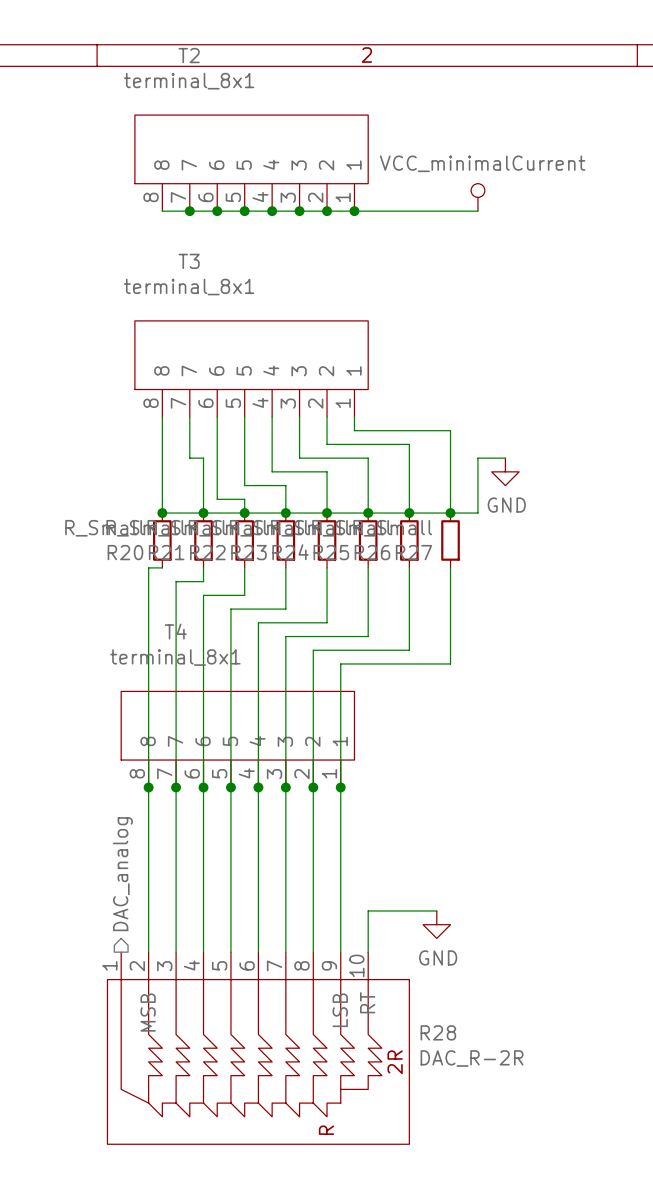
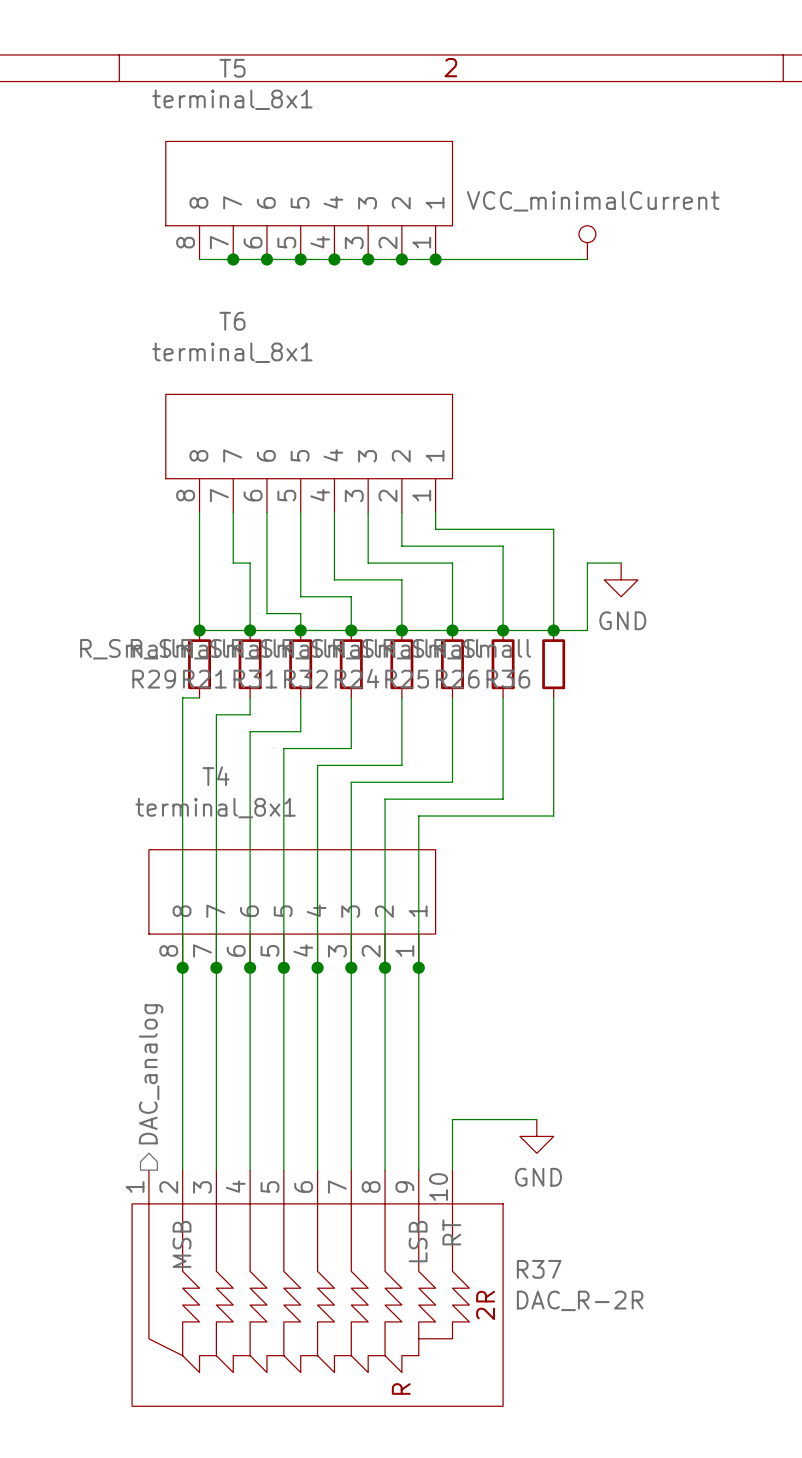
T2 name: T2 (189, 55) -> T5 (232, 68)
T3 name: T3 (189, 261) -> T6 (232, 321)
R20 name: R20 (125, 552) -> R29 (154, 679)
R22 name: R22 (207, 552) -> R31 (255, 679)
R23 name: R23 (248, 552) -> R32 (305, 679)
R27 name: R27 (413, 552) -> R36 (508, 679)
R28 name: R28 (438, 1032) -> R37 (539, 1269)

